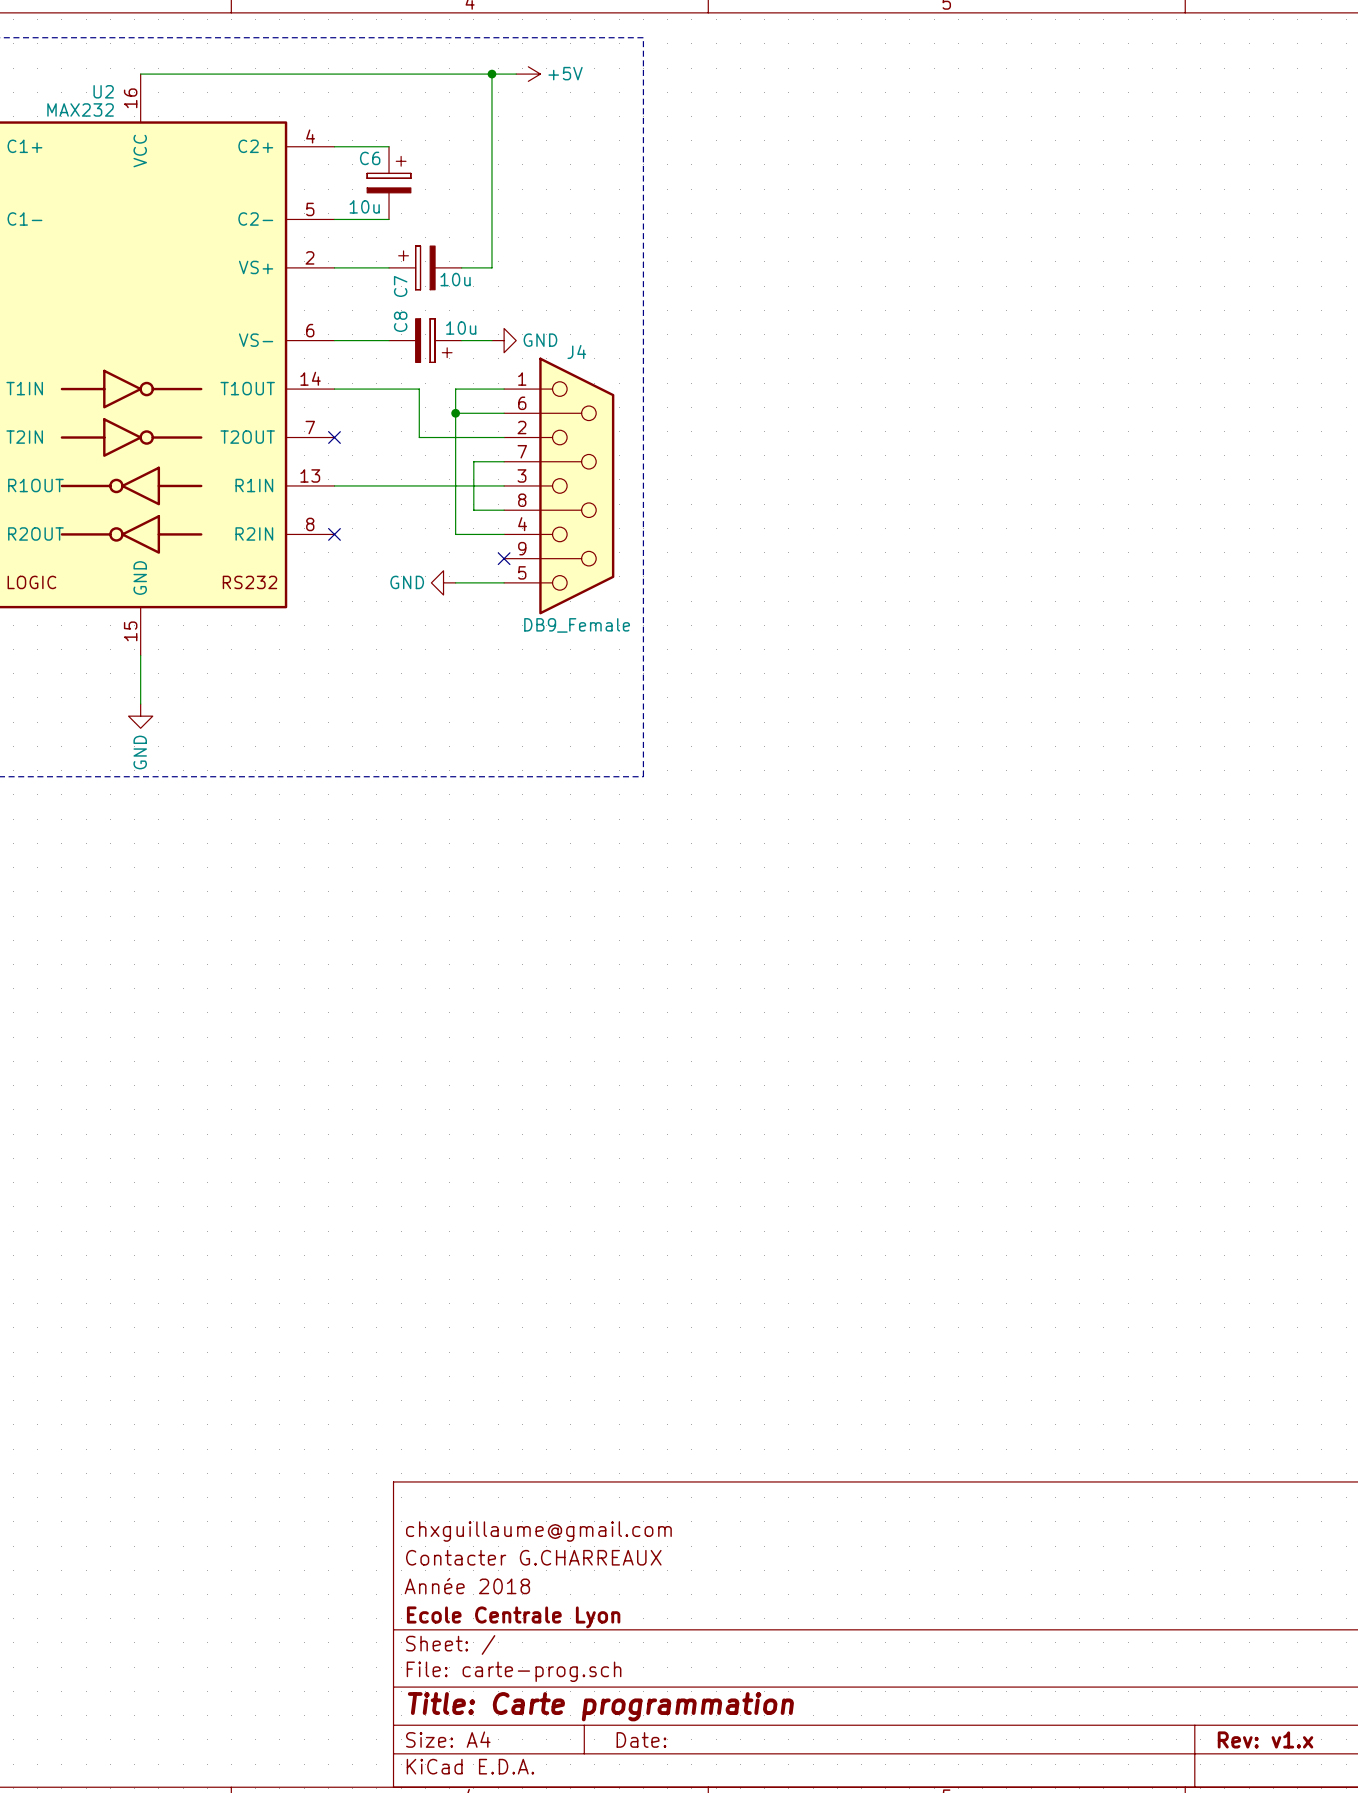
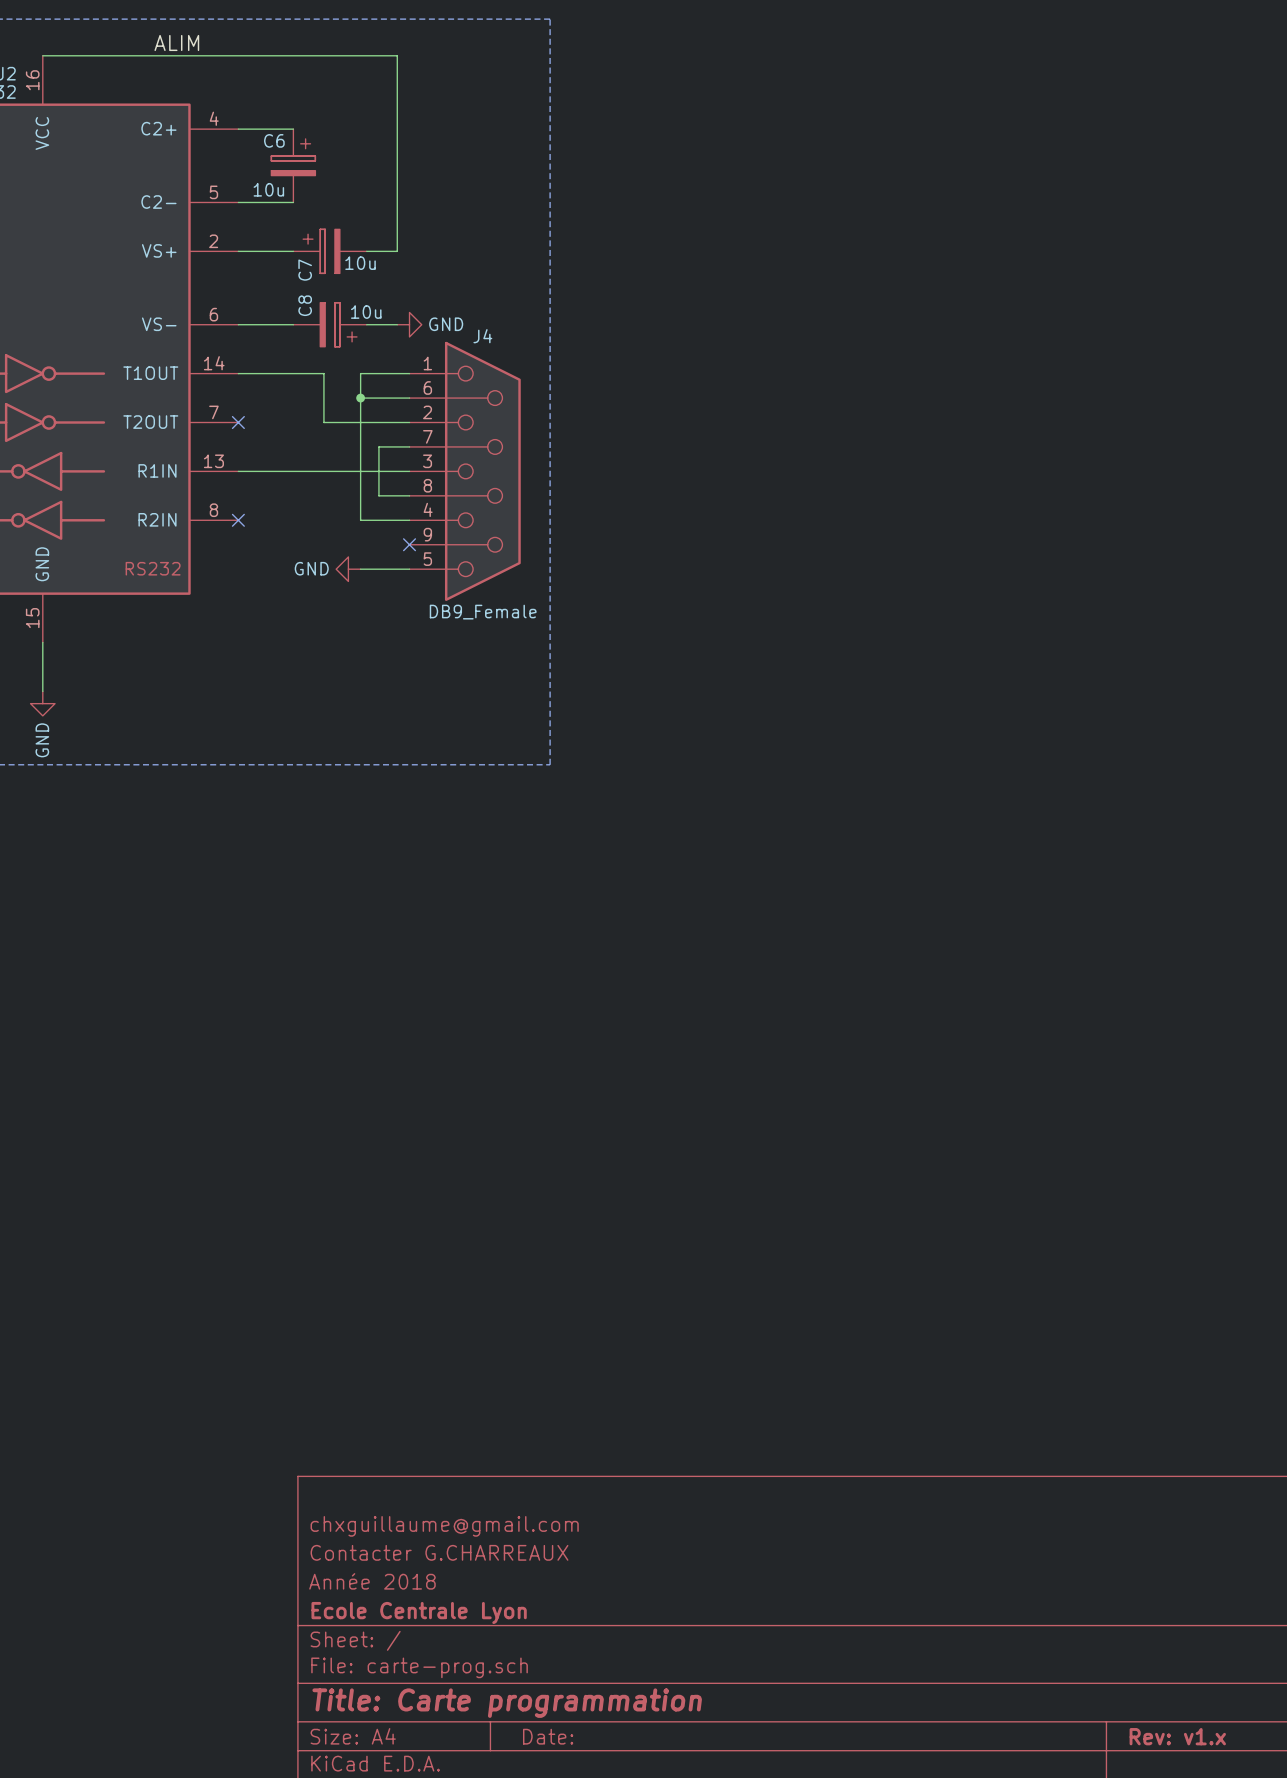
label: none -> ALIM (176, 42)
wire: (491, 74) (516, 74) -> none
junction: (491, 74) -> none
power symbol: +5V (528, 74) -> none

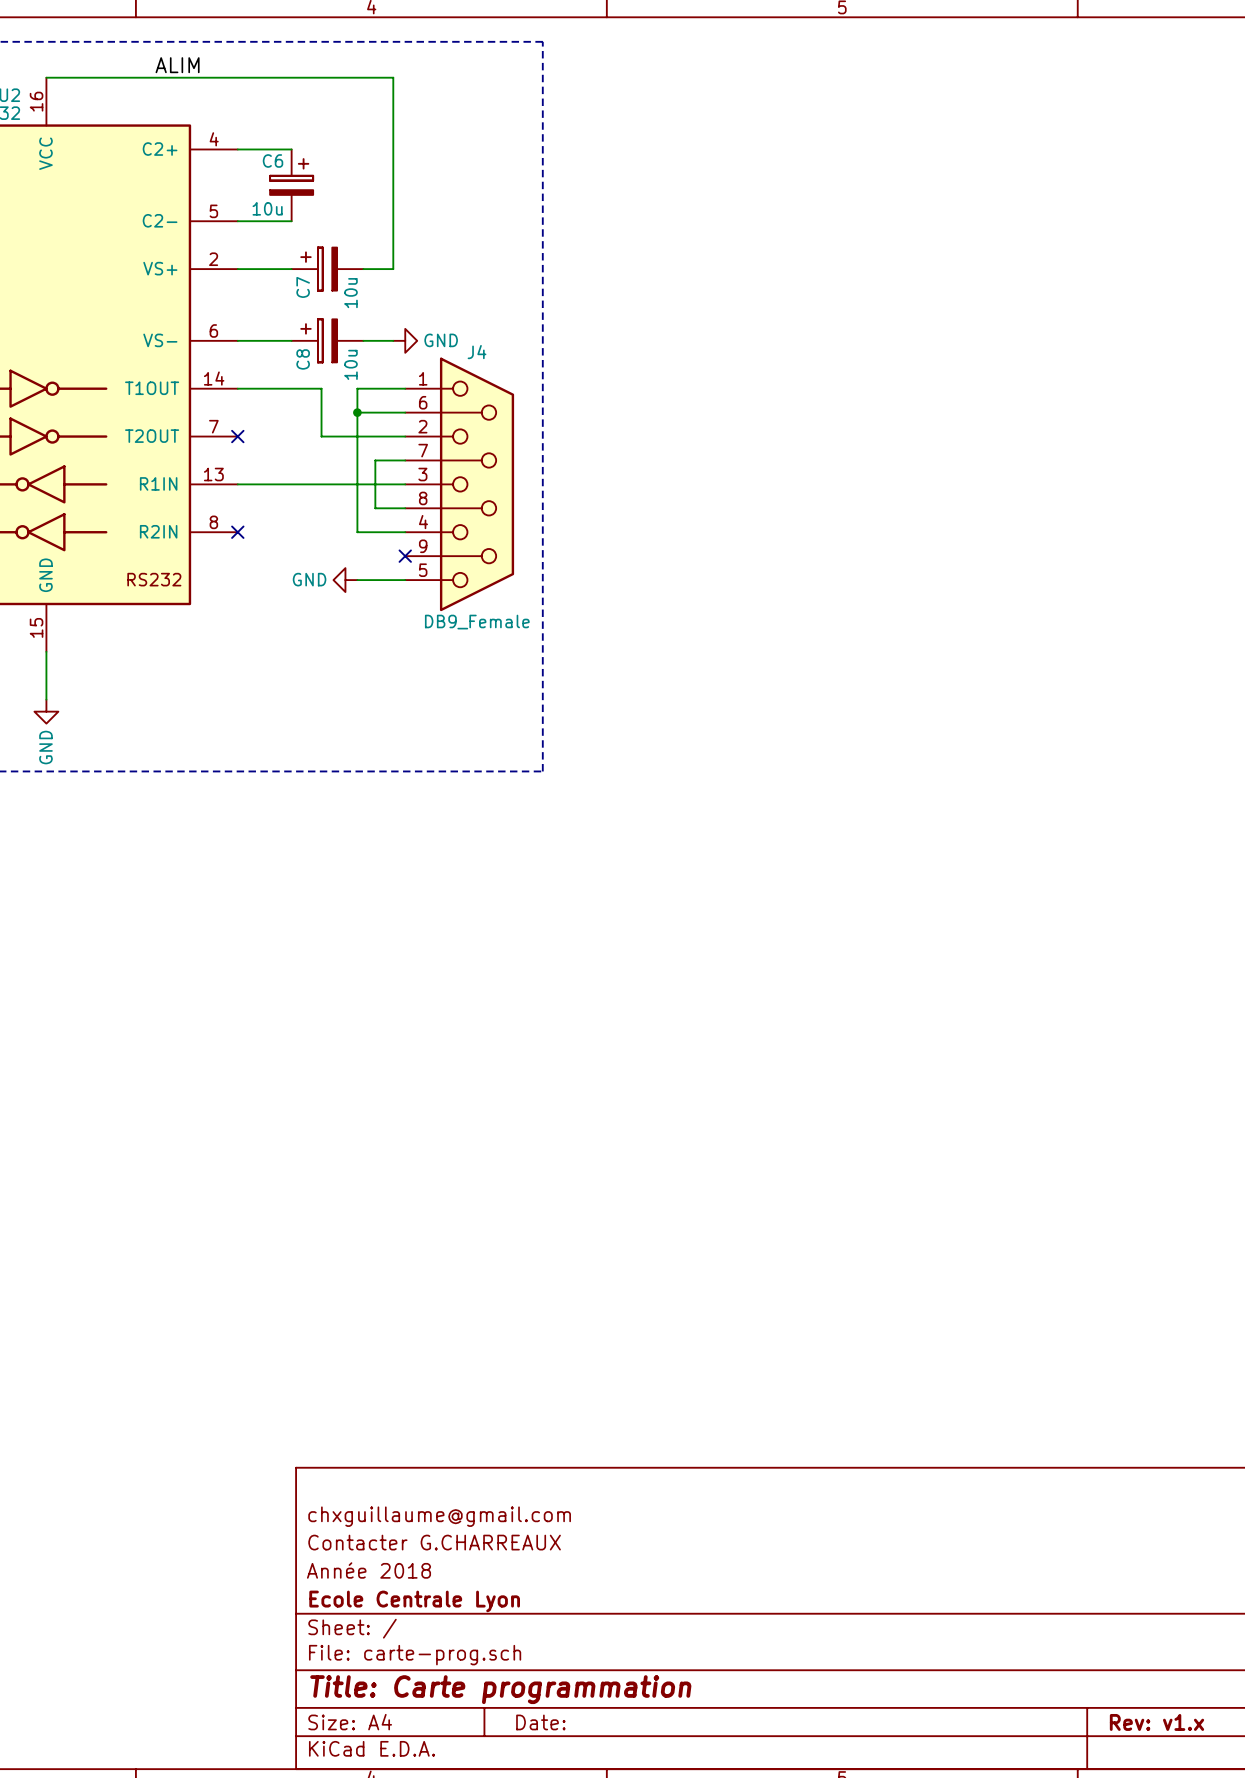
C7 value rotation: 0° (360, 263) -> 90° counterclockwise (350, 293)
C8 name position: C8 (305, 305) -> C8 (303, 359)
C8 value position: 10u (366, 312) -> 10u (350, 364)
C8 rotation: 0° (338, 324) -> 180° (319, 340)

